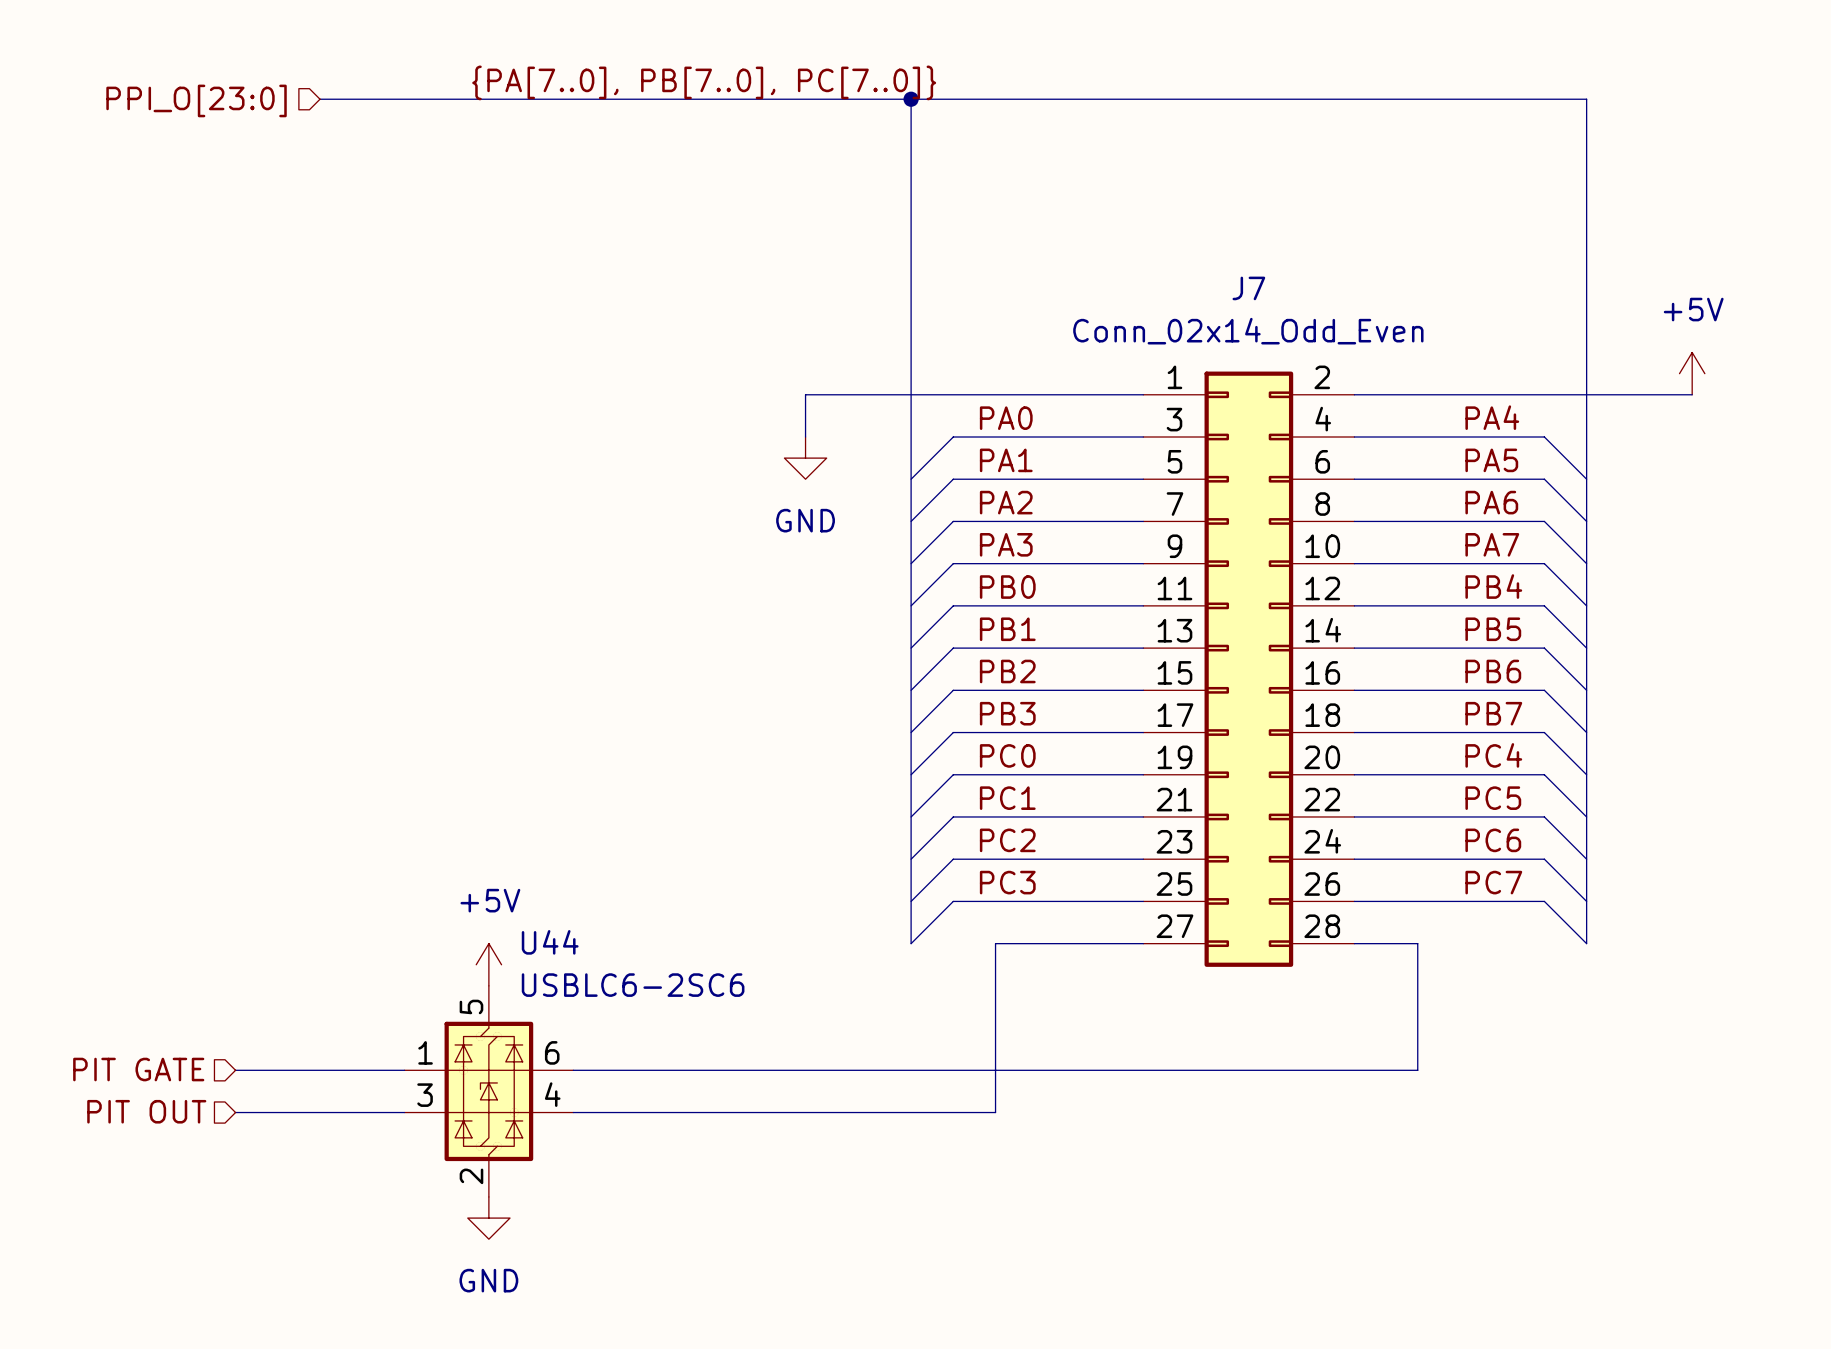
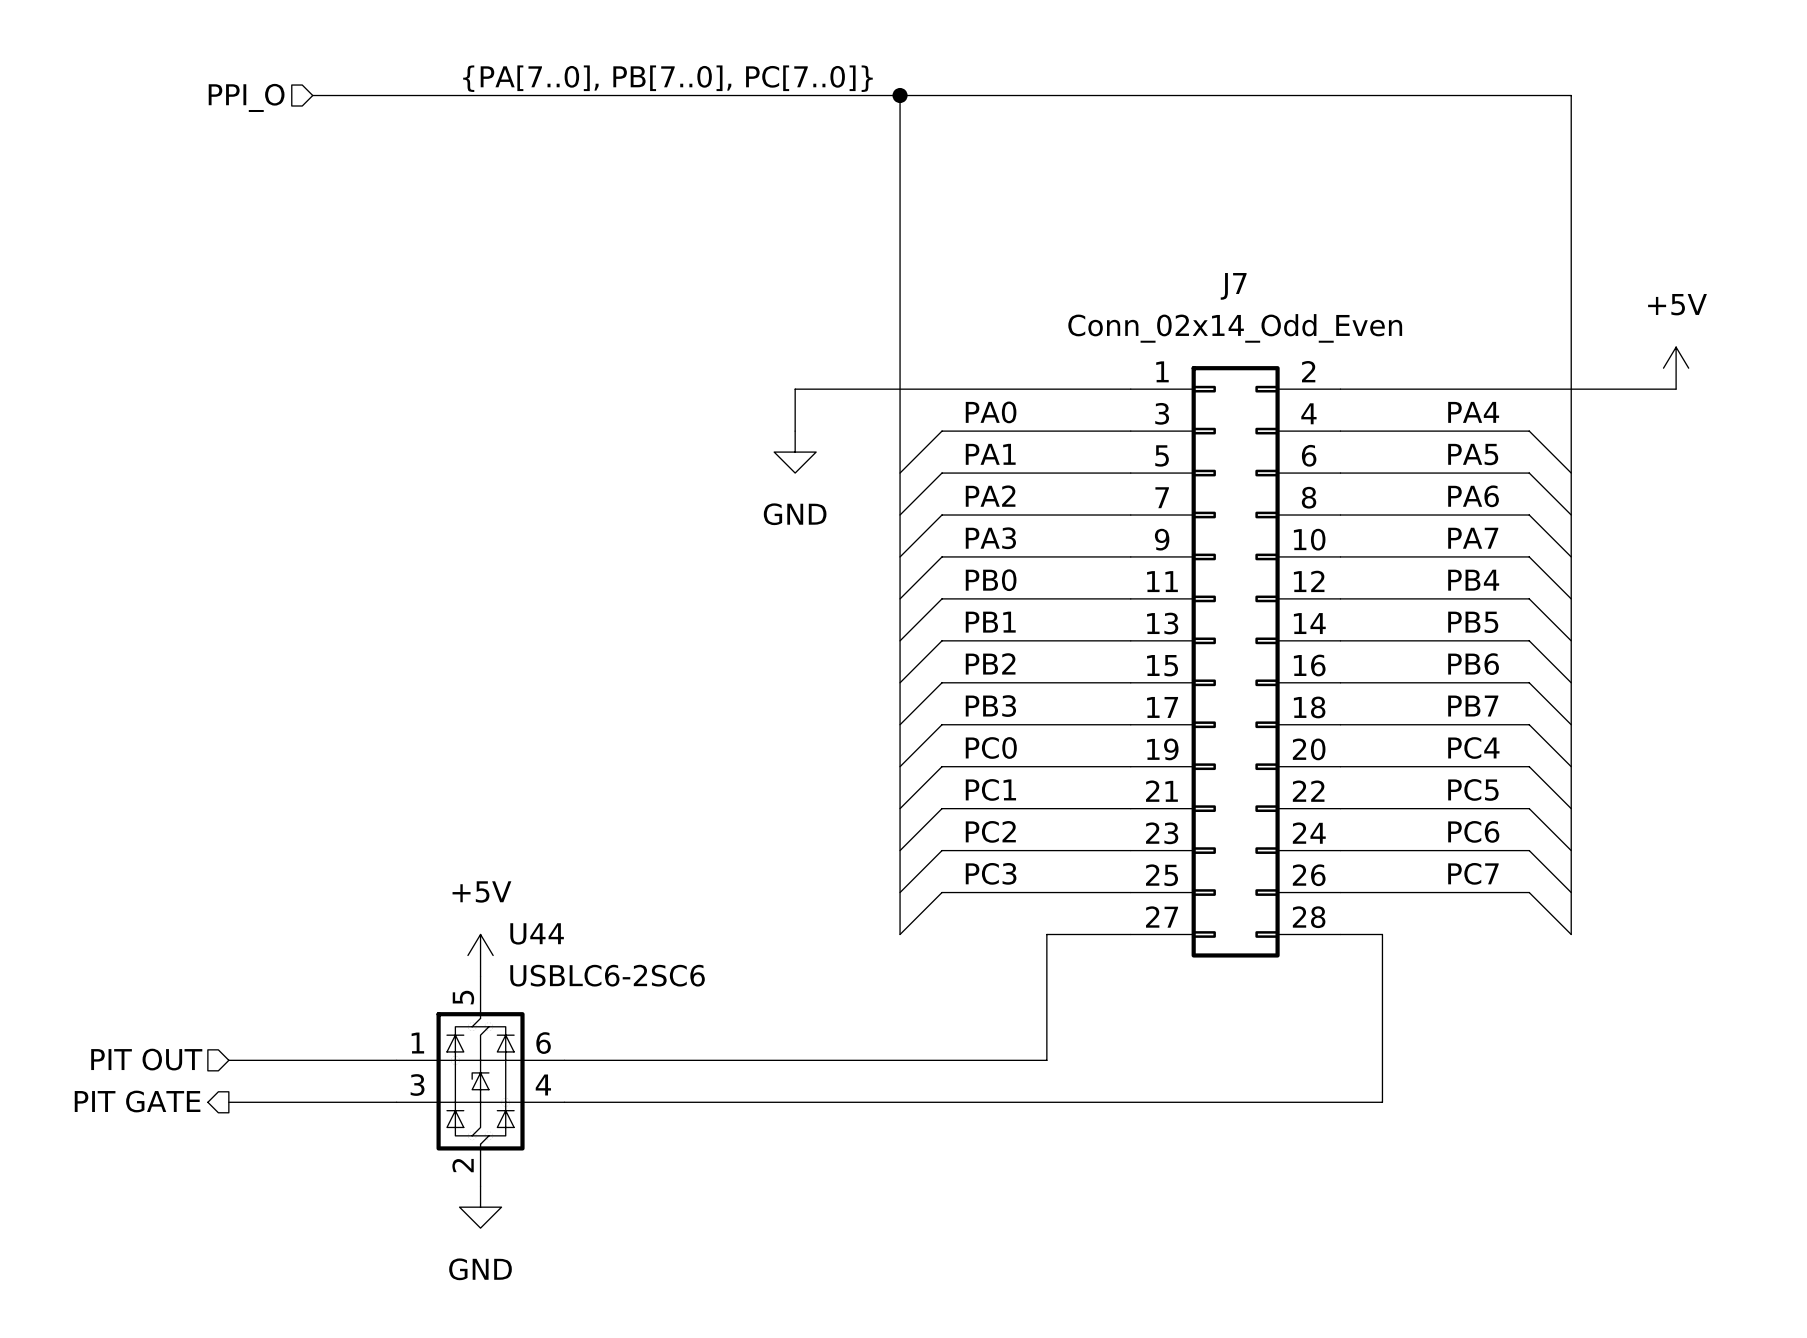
hierarchical label: PPI_O[23:0] (196, 100) -> PPI_O (246, 97)
wire: (1058, 943) (995, 943) (995, 1112) -> (1046, 934) (1046, 1060)
wire: (1396, 943) (1417, 943) (1417, 1070) (1058, 1070) -> (1382, 934) (1382, 1102) (983, 1102)
hierarchical label: PIT GATE (138, 1069) -> PIT OUT (146, 1059)
hierarchical label shape: input (146, 1111) -> output (137, 1101)
hierarchical label: PIT OUT (146, 1111) -> PIT GATE (137, 1101)

